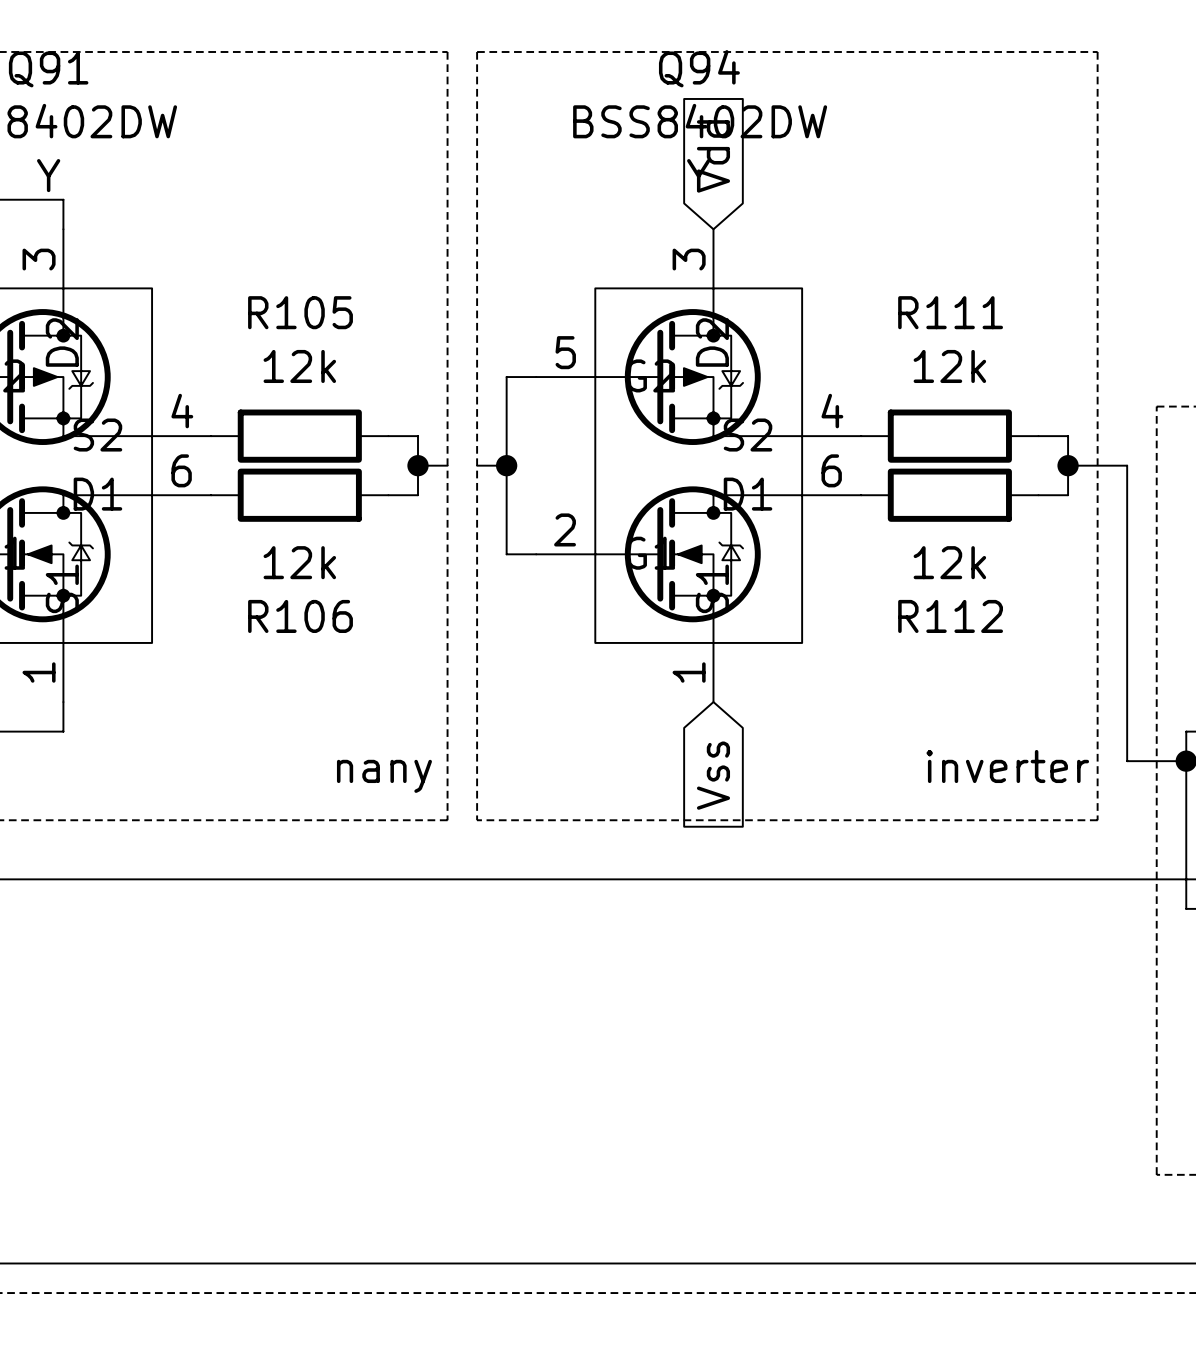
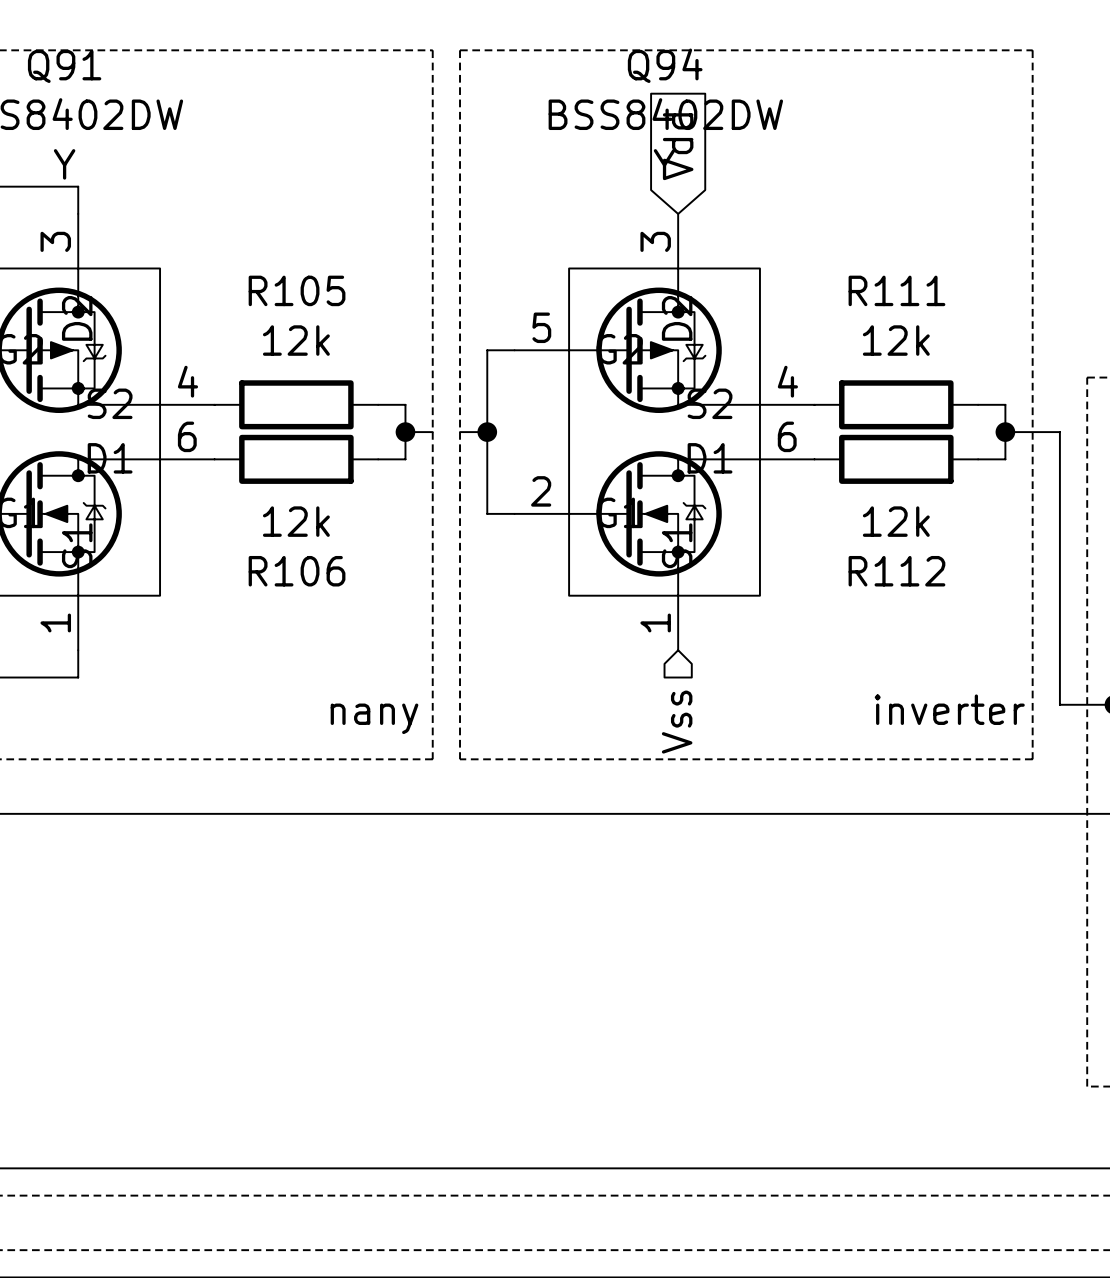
global label: Vss (713, 775) -> none
hierarchical label: none -> Vss (677, 722)

